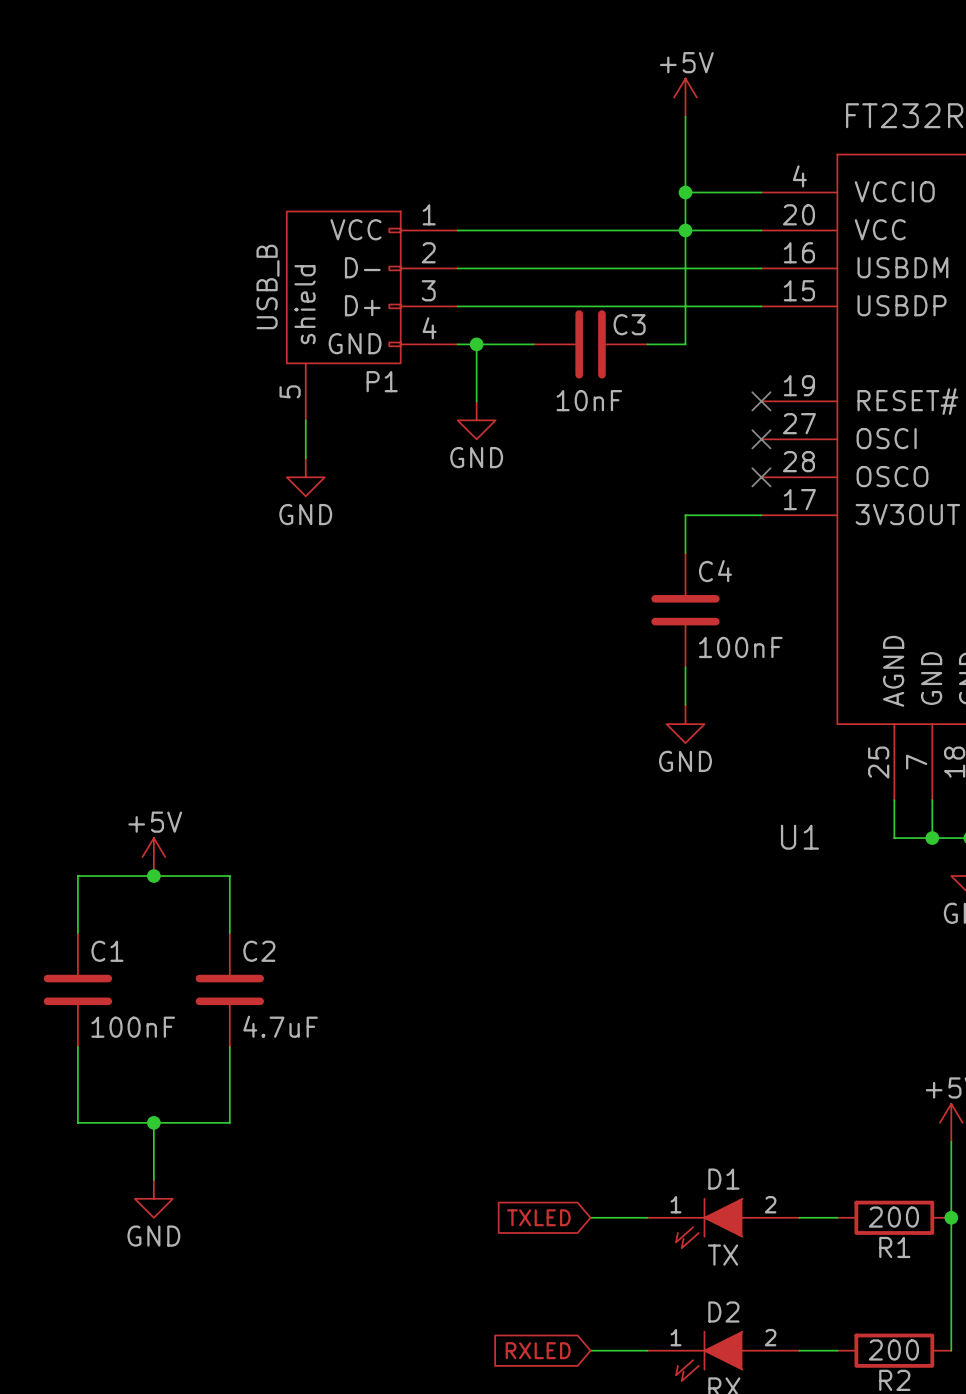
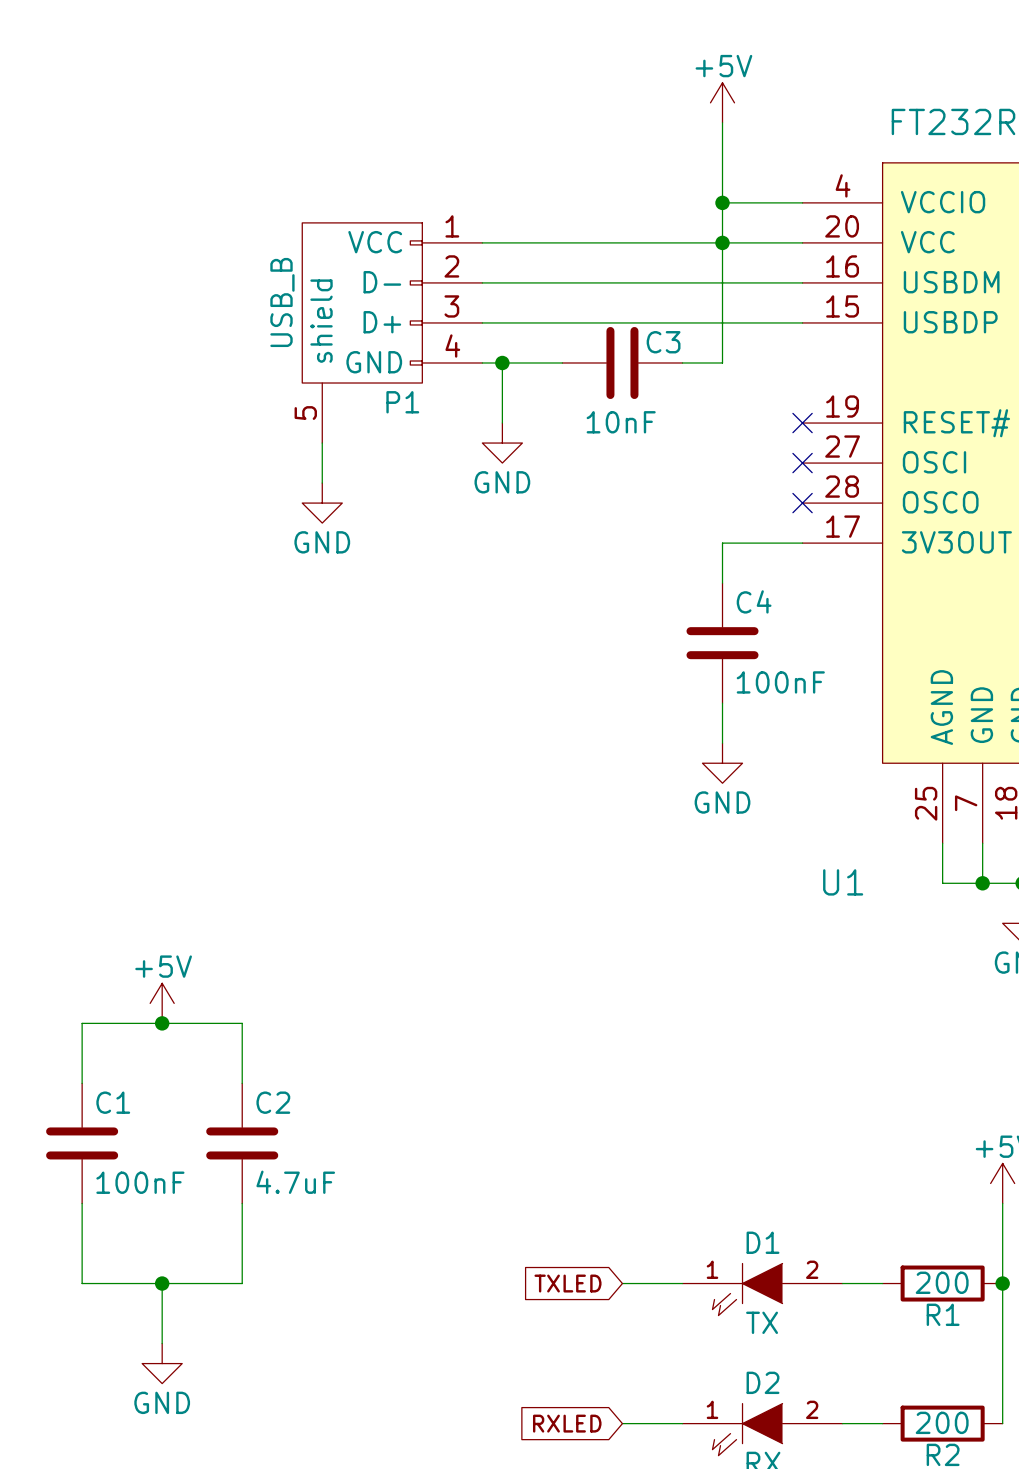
power symbol position: +5V (153, 857) -> +5V (162, 1003)
junction: (153, 876) -> none
wire: (77, 932) (77, 876) (229, 876) (229, 932) -> (82, 1083) (82, 1023) (242, 1023) (242, 1083)
junction: none -> (162, 1023)
C1 position: (77, 989) -> (82, 1143)
C2 position: (229, 989) -> (242, 1143)
wire: (77, 1046) (77, 1122) (229, 1122) (229, 1046) -> (82, 1203) (82, 1283) (242, 1283) (242, 1203)
wire: (153, 1122) (153, 1179) -> (162, 1283) (162, 1343)
junction: (153, 1122) -> none
power symbol position: GND (153, 1198) -> GND (162, 1363)
junction: none -> (162, 1283)

